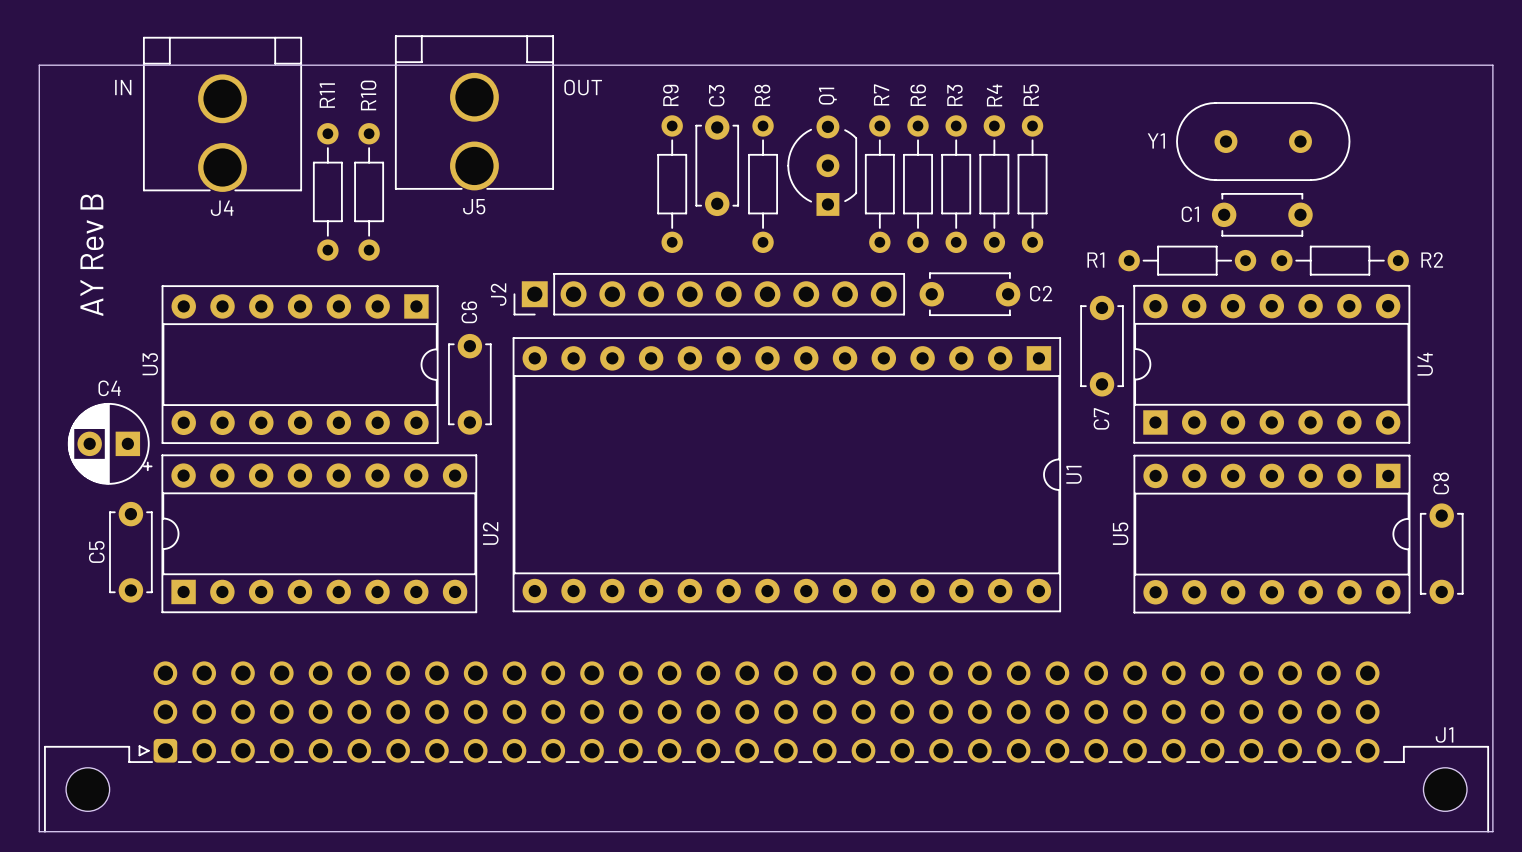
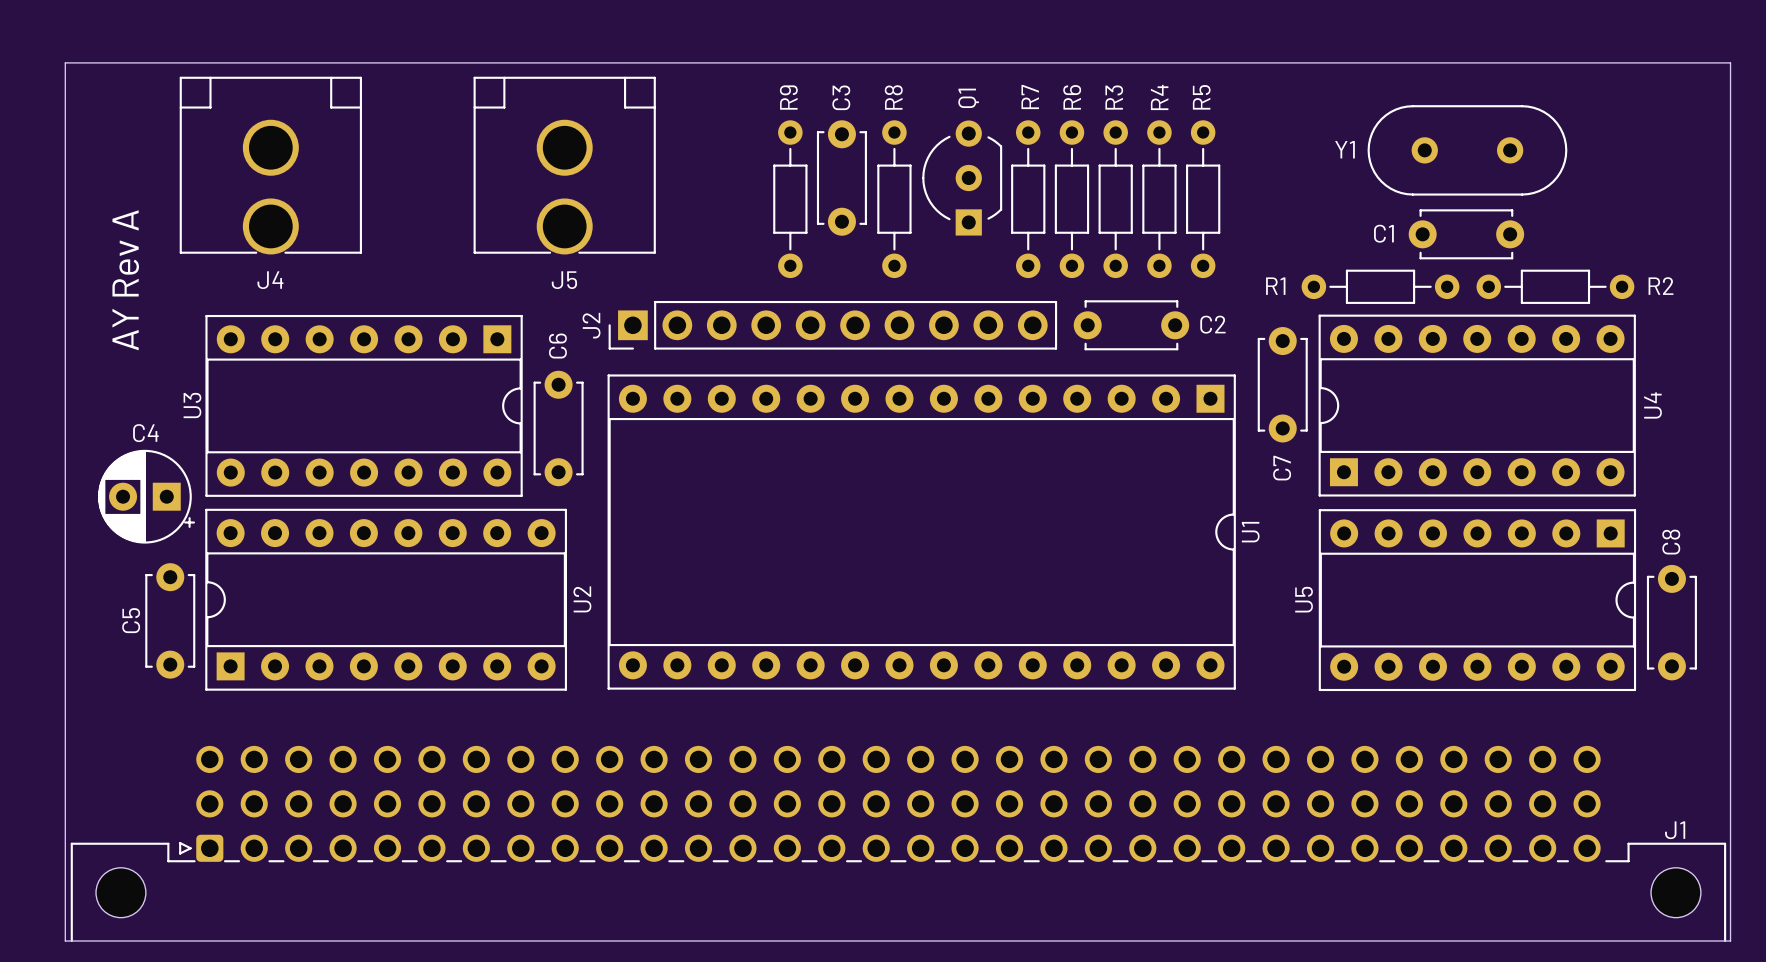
text: IN (123, 87) -> none
text: OUT (583, 87) -> none
J5 position: (474, 112) -> (564, 165)
J4 position: (222, 114) -> (270, 165)
R11: (327, 191) -> none
R10: (369, 191) -> none
J5 name position: J5 (474, 206) -> J5 (564, 280)
J4 name position: J4 (222, 208) -> J4 (270, 280)
text: AY Rev B (92, 255) -> AY Rev A (125, 280)

